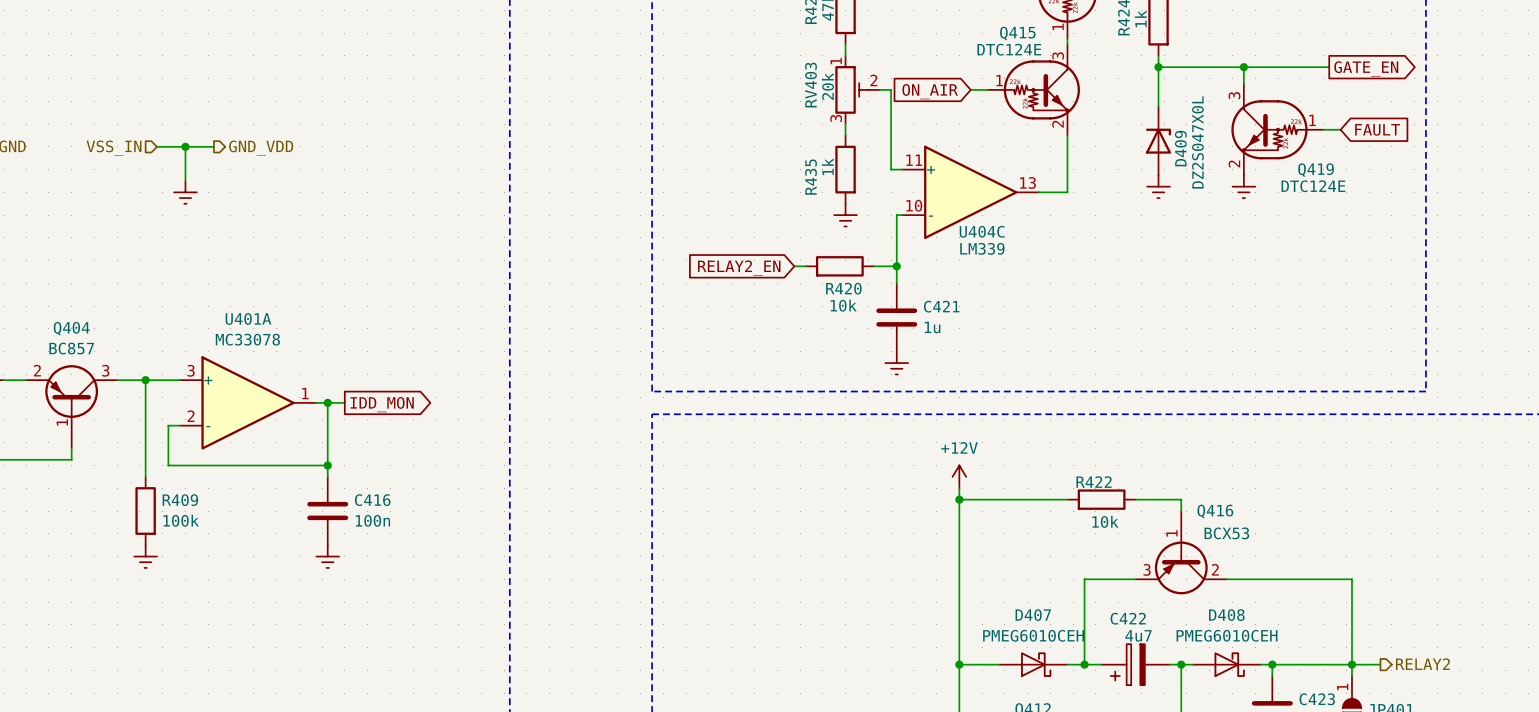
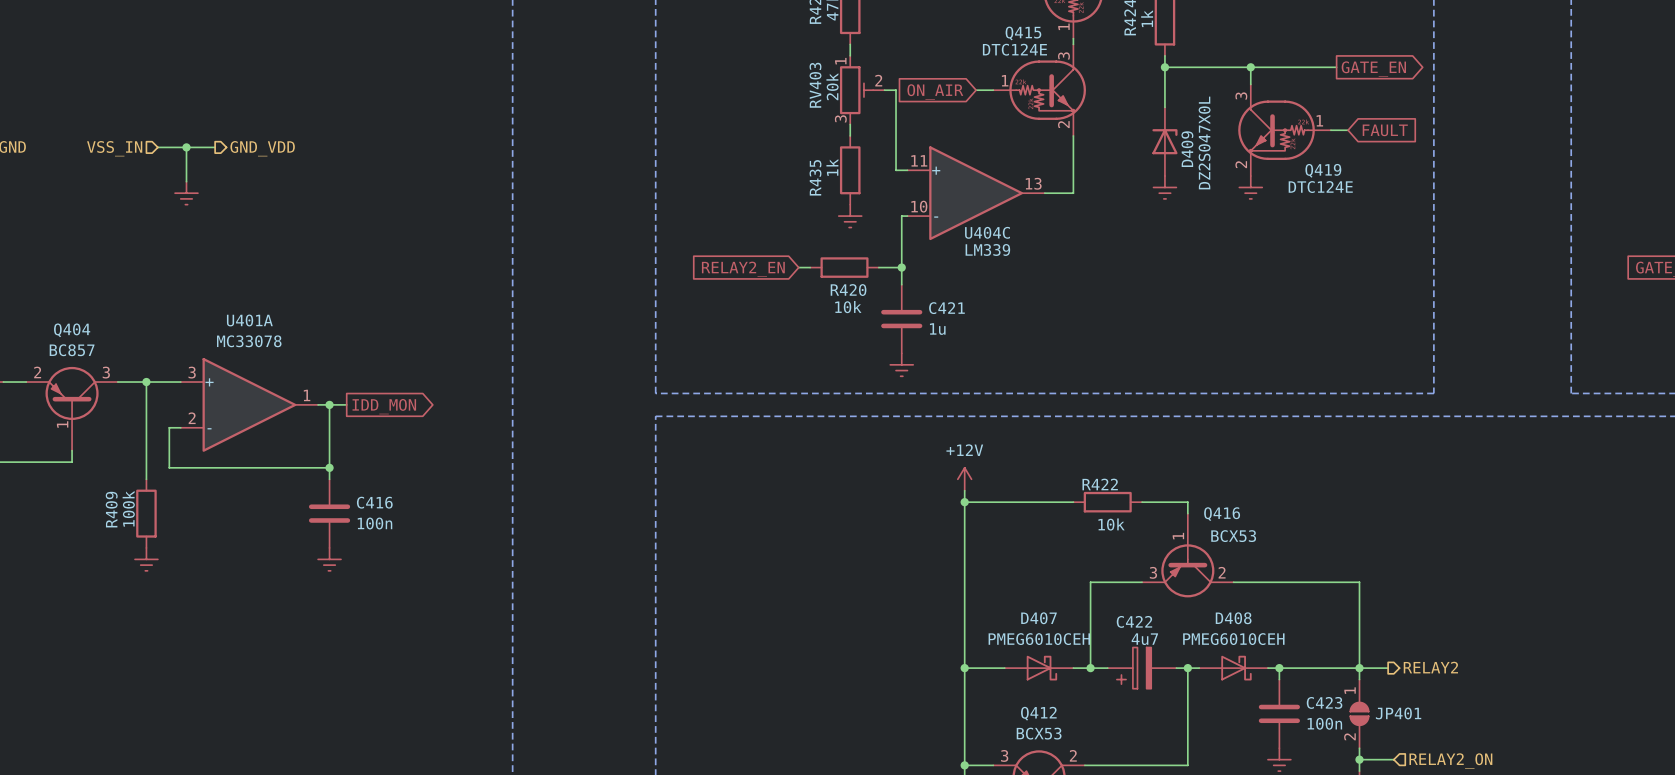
R409 name rotation: 0° (180, 500) -> 90° counterclockwise (111, 509)
R409 name position: R409 (180, 500) -> R409 (111, 509)
R409 value rotation: 0° (181, 520) -> 90° counterclockwise (128, 508)
R409 value position: 100k (181, 520) -> 100k (128, 508)

